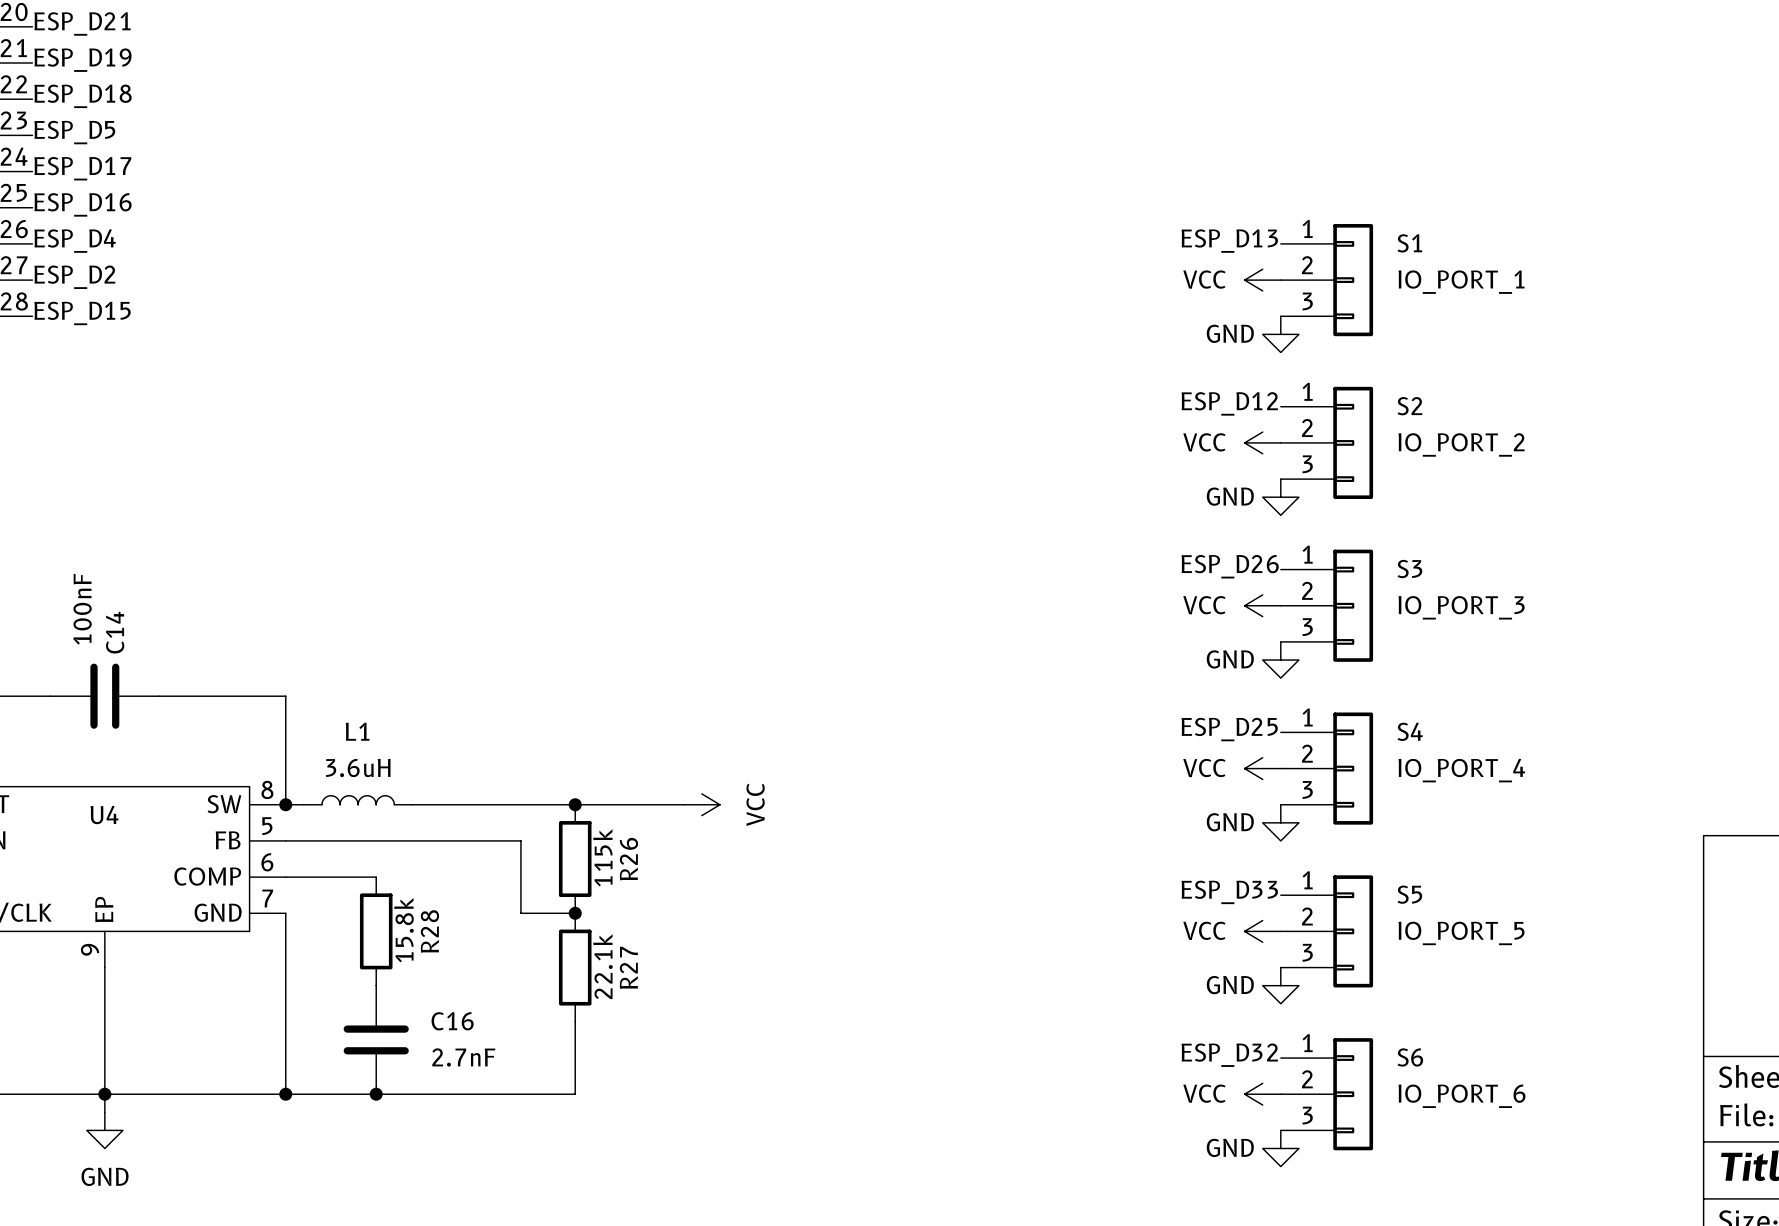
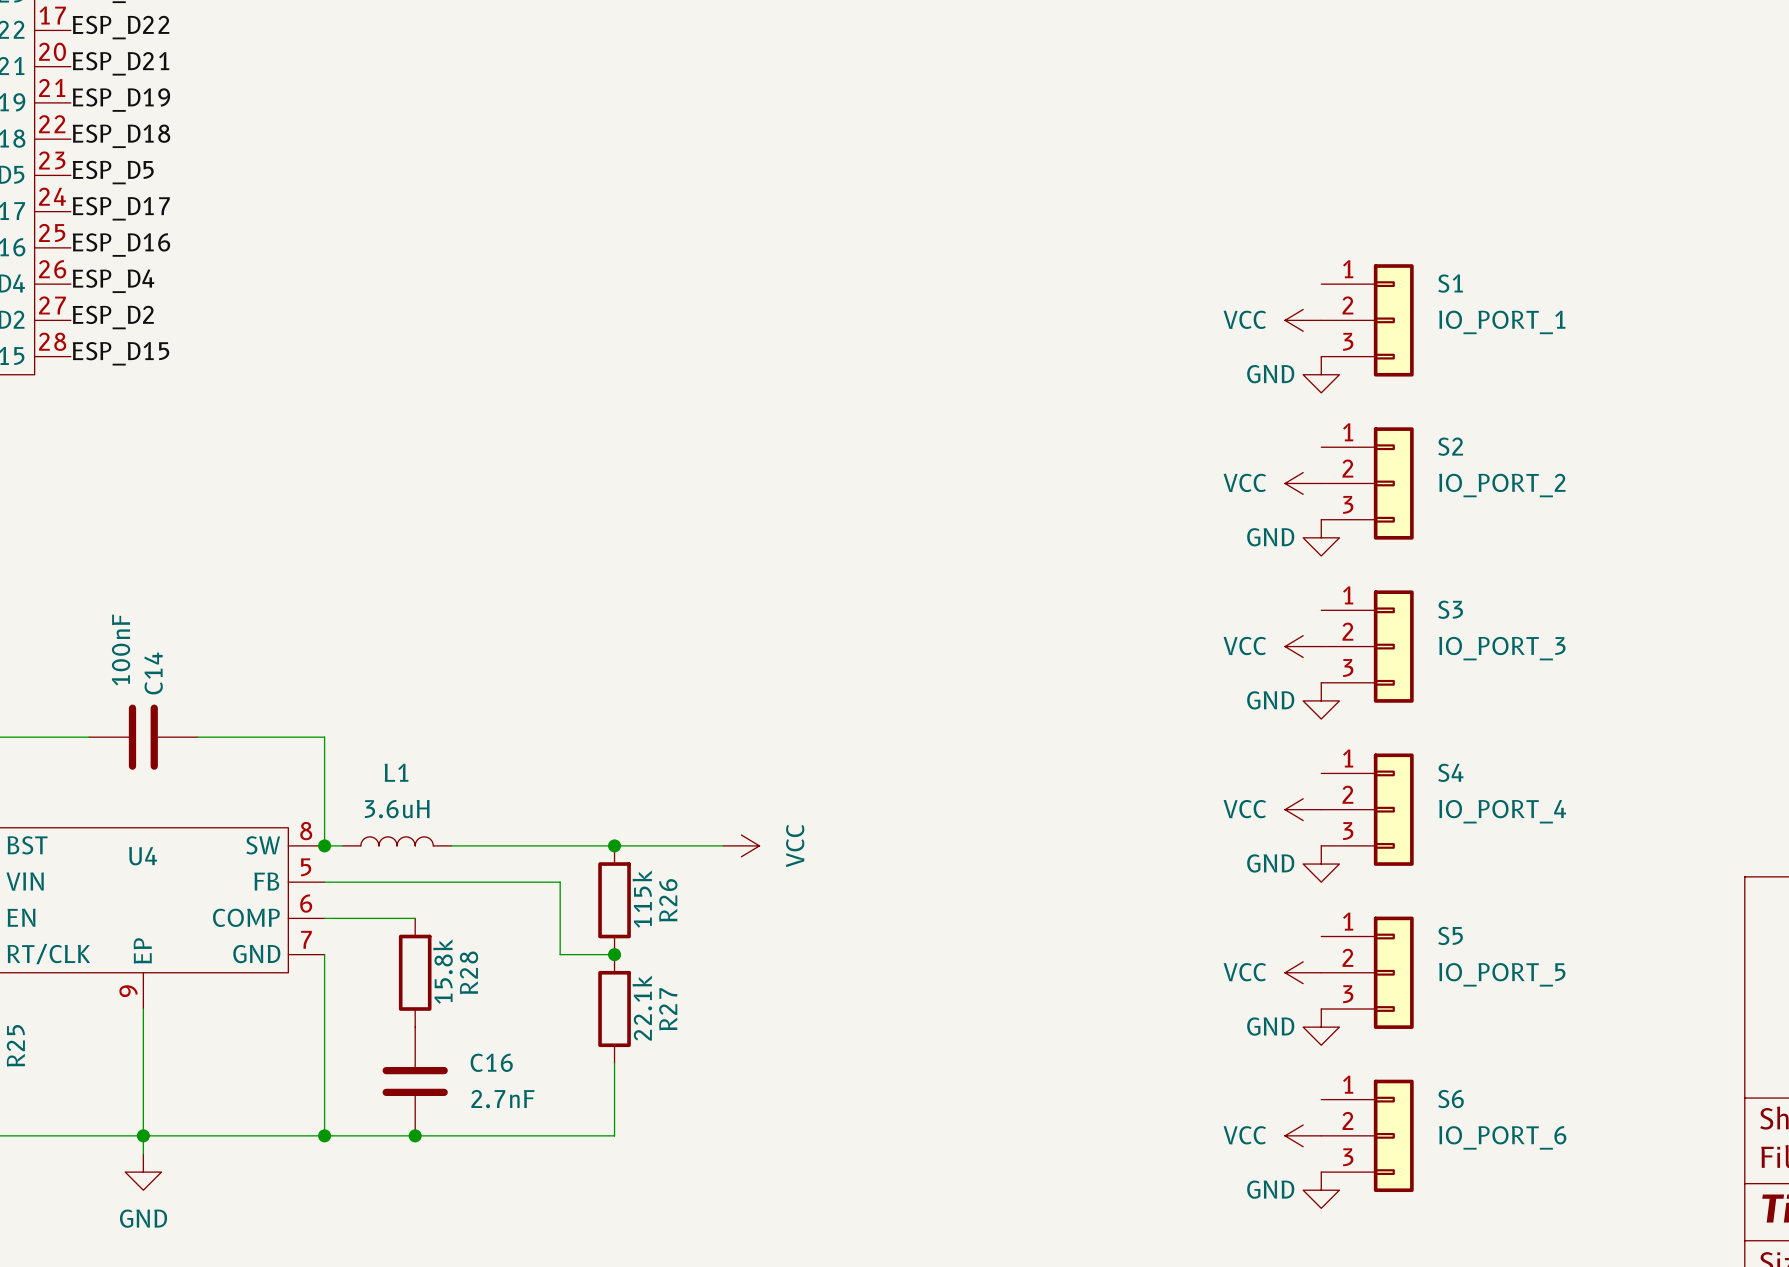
label: ESP_D13 (1229, 241) -> none
label: ESP_D12 (1229, 403) -> none
label: ESP_D26 (1230, 566) -> none
label: ESP_D25 (1229, 729) -> none
label: ESP_D33 (1229, 892) -> none
label: ESP_D32 (1229, 1055) -> none

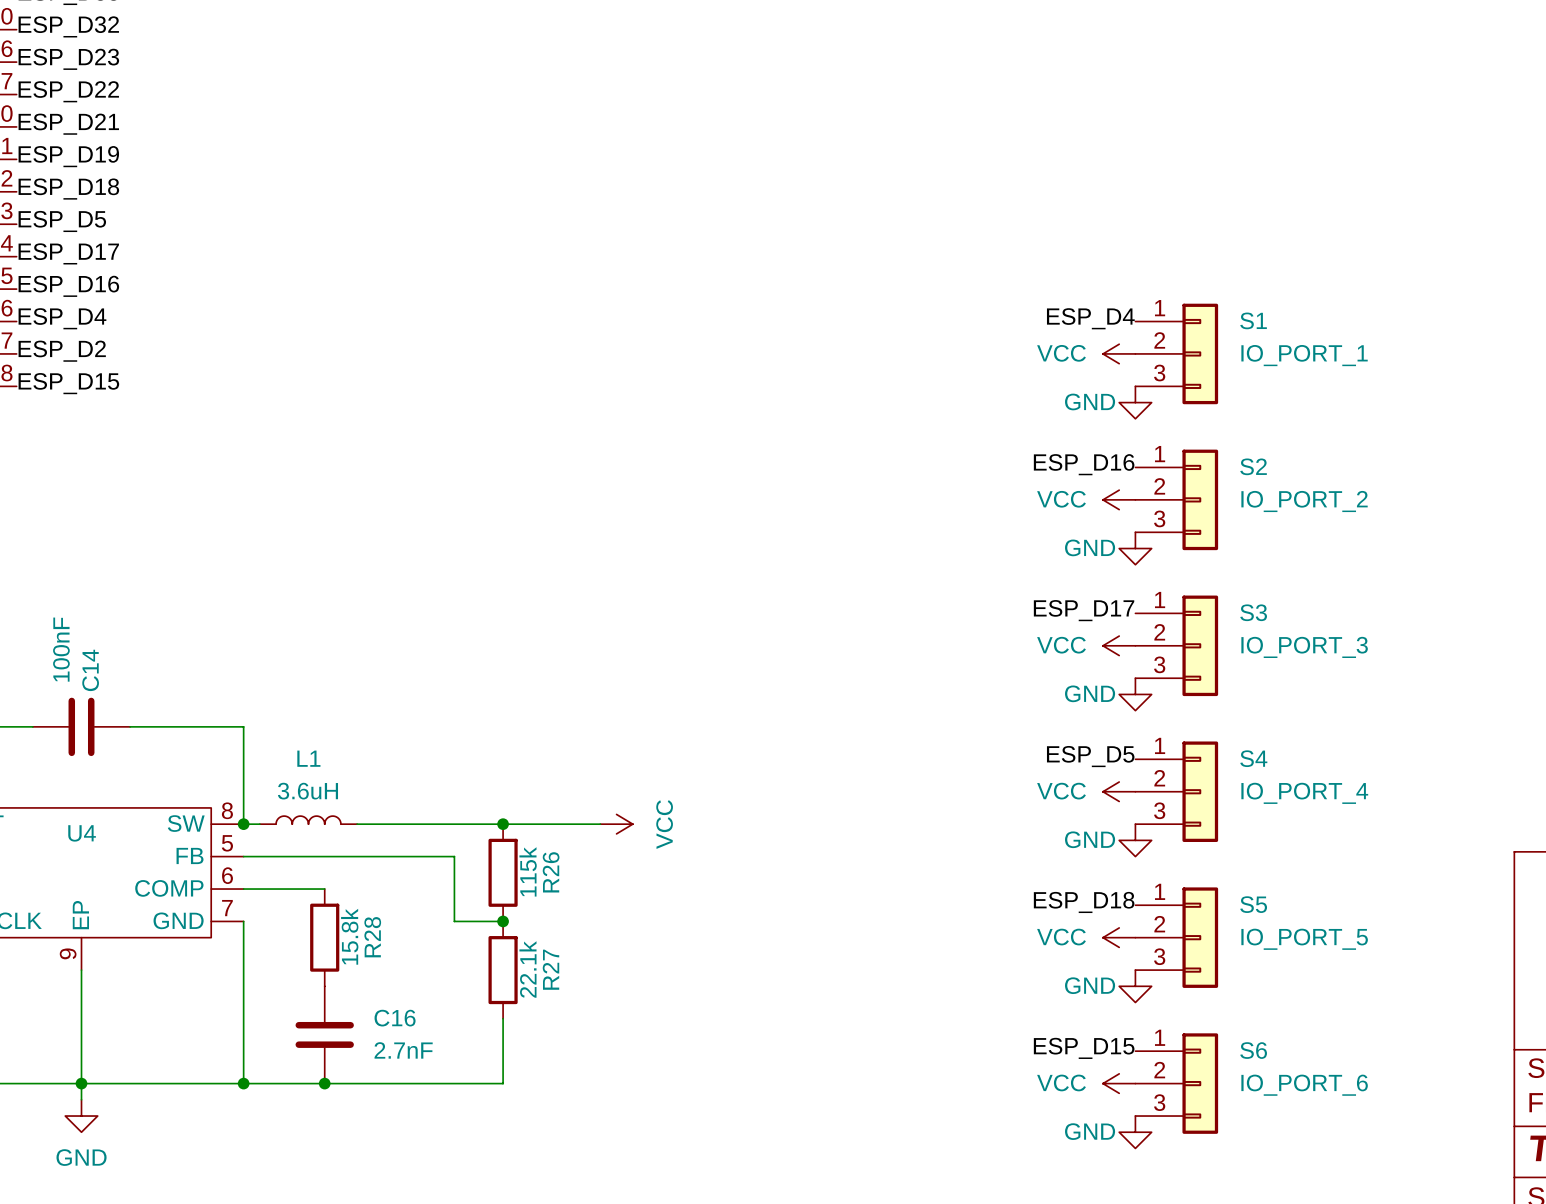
label: none -> ESP_D4 (1090, 318)
label: none -> ESP_D16 (1084, 464)
label: none -> ESP_D17 (1084, 610)
label: none -> ESP_D5 (1090, 756)
label: none -> ESP_D18 (1084, 902)
label: none -> ESP_D15 (1084, 1048)

